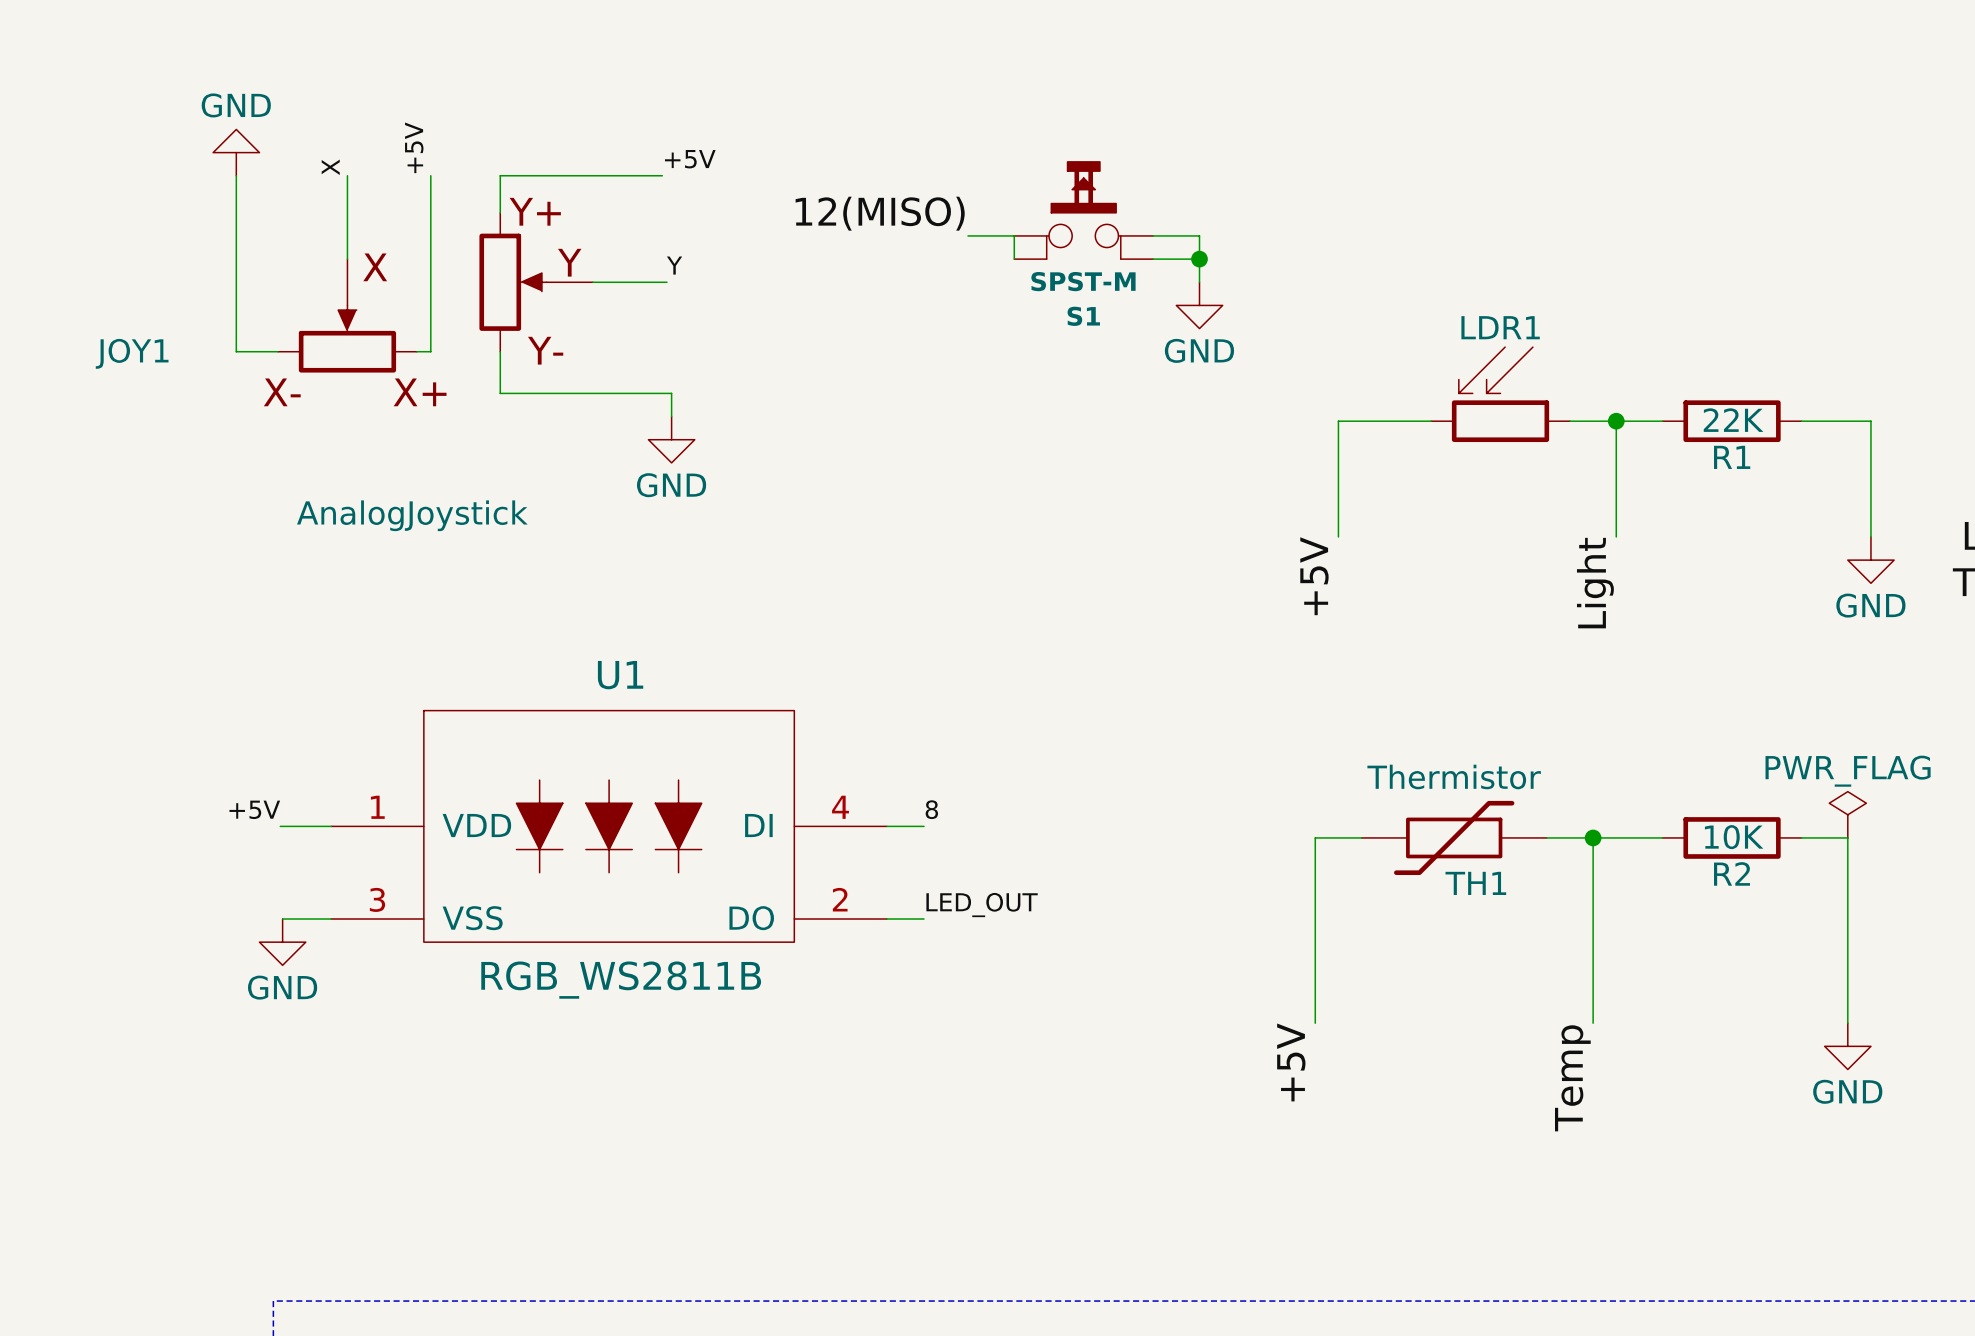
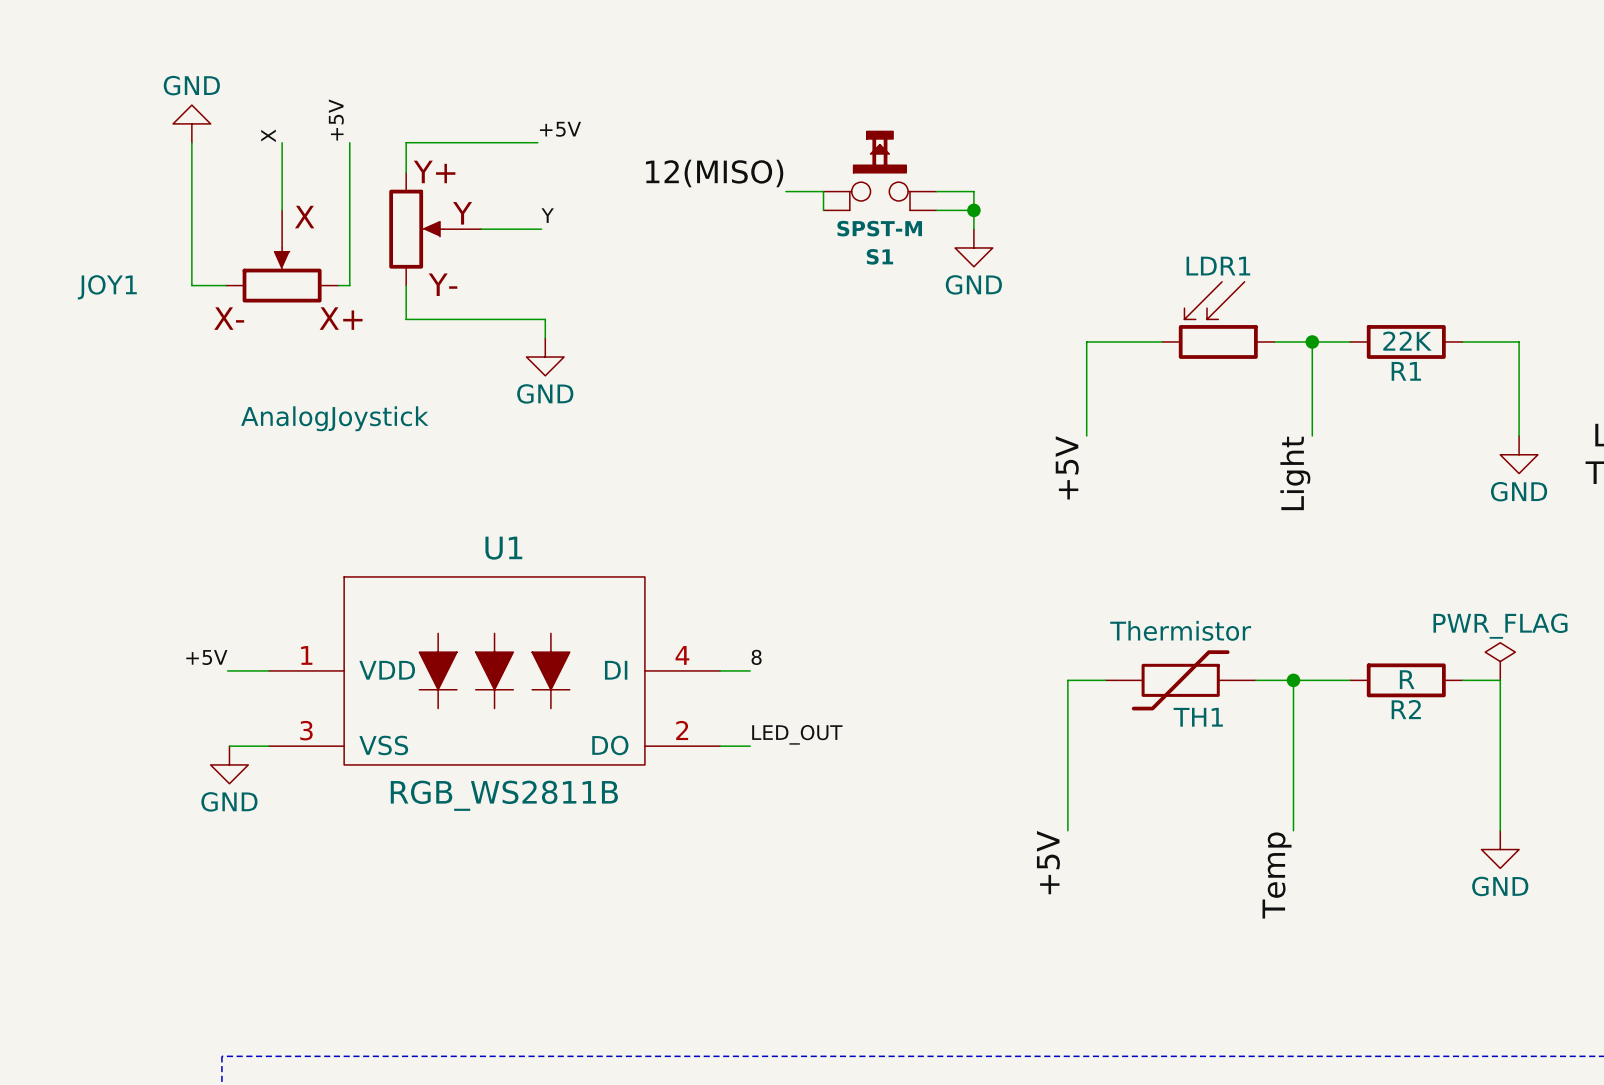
R2 value: 10K (1734, 837) -> R (1407, 679)

